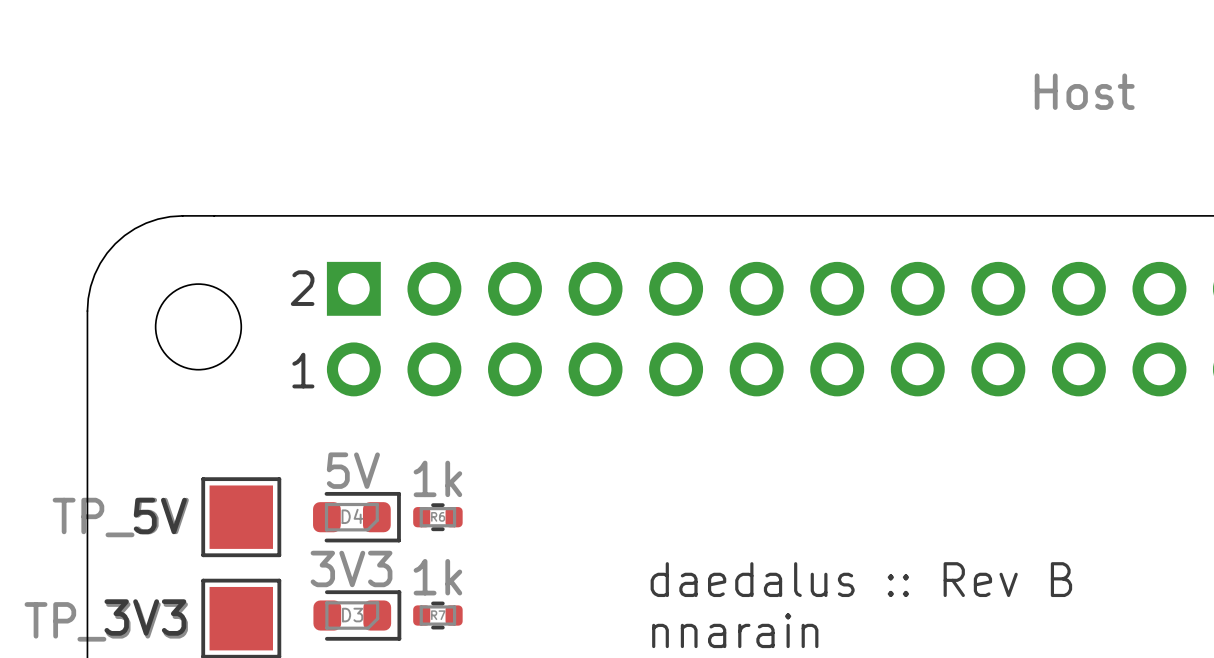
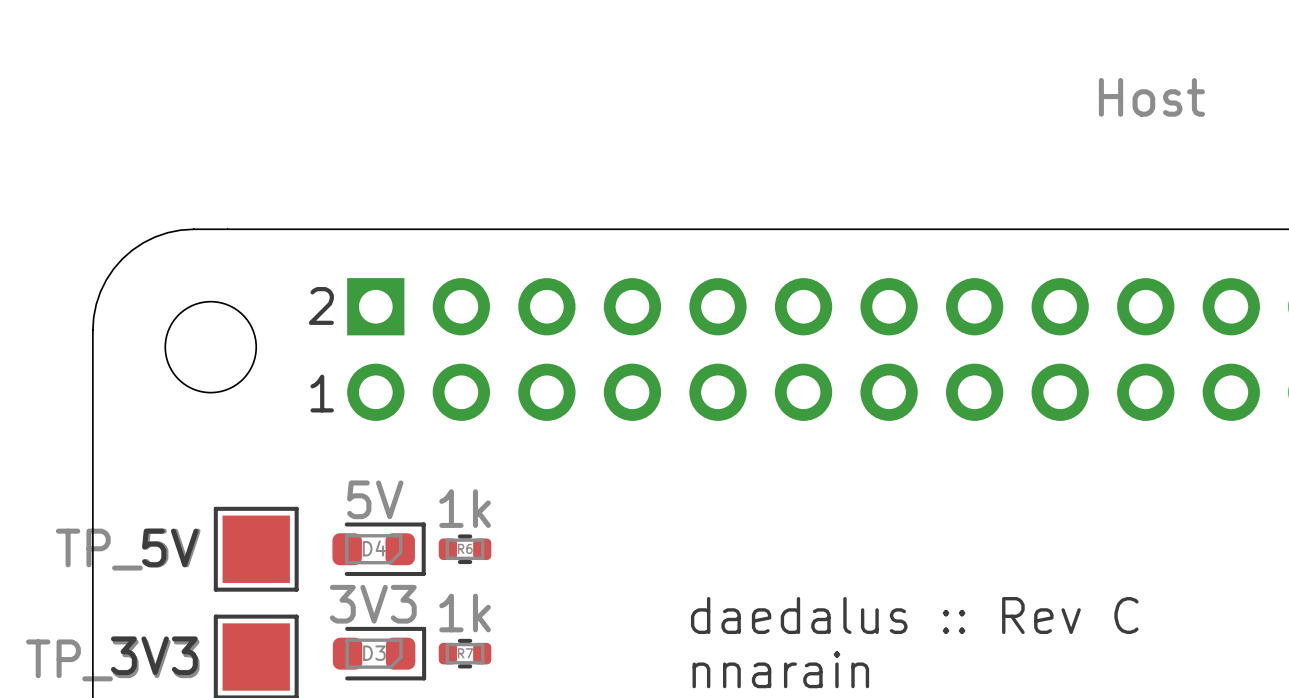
text: daedalus :: Rev B (861, 579) -> daedalus :: Rev C (914, 615)

